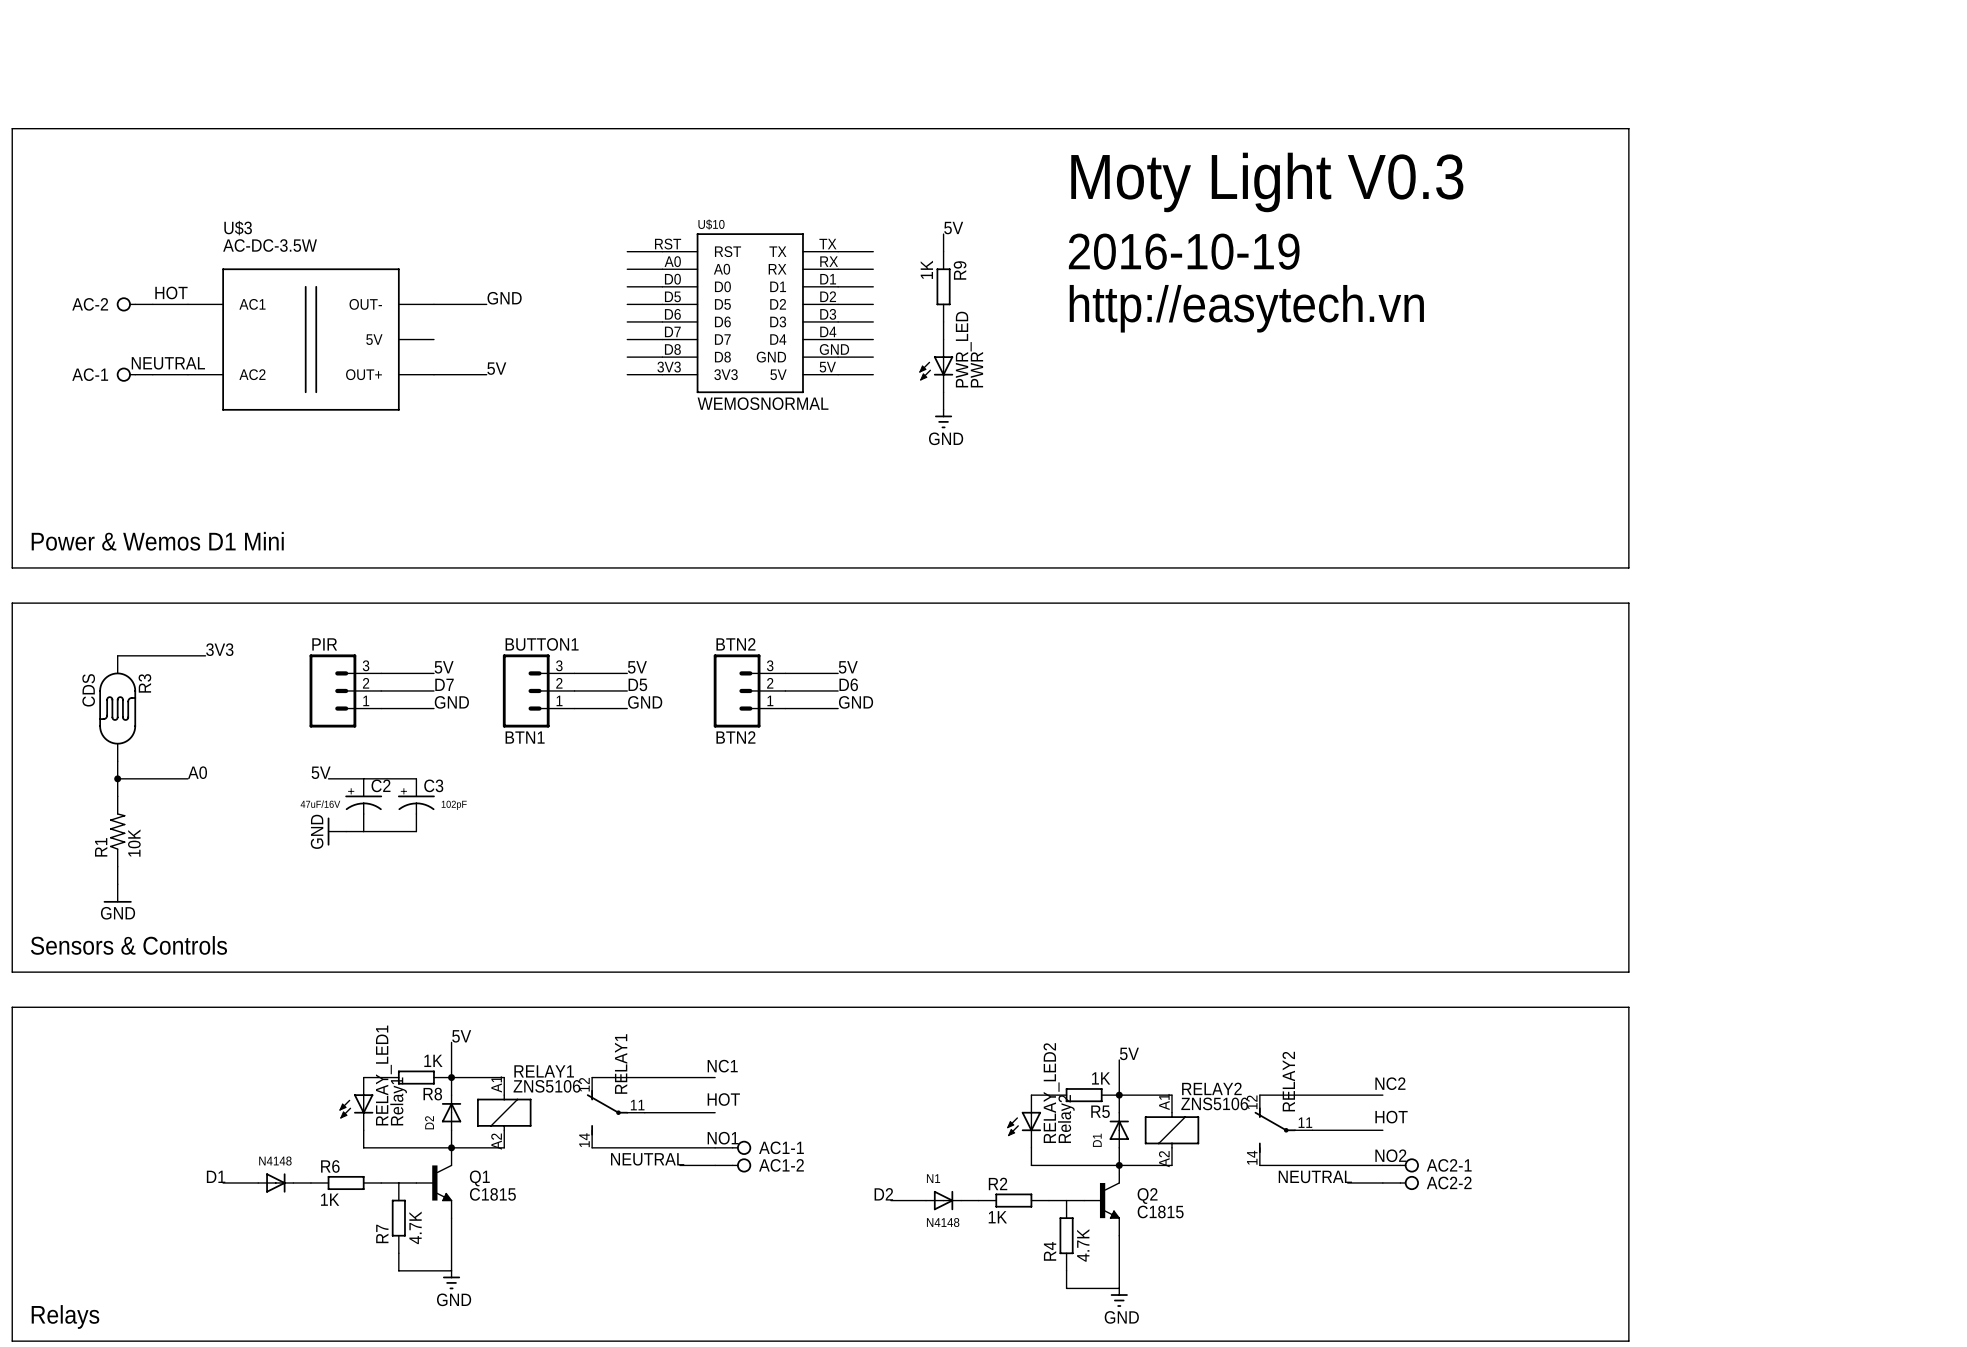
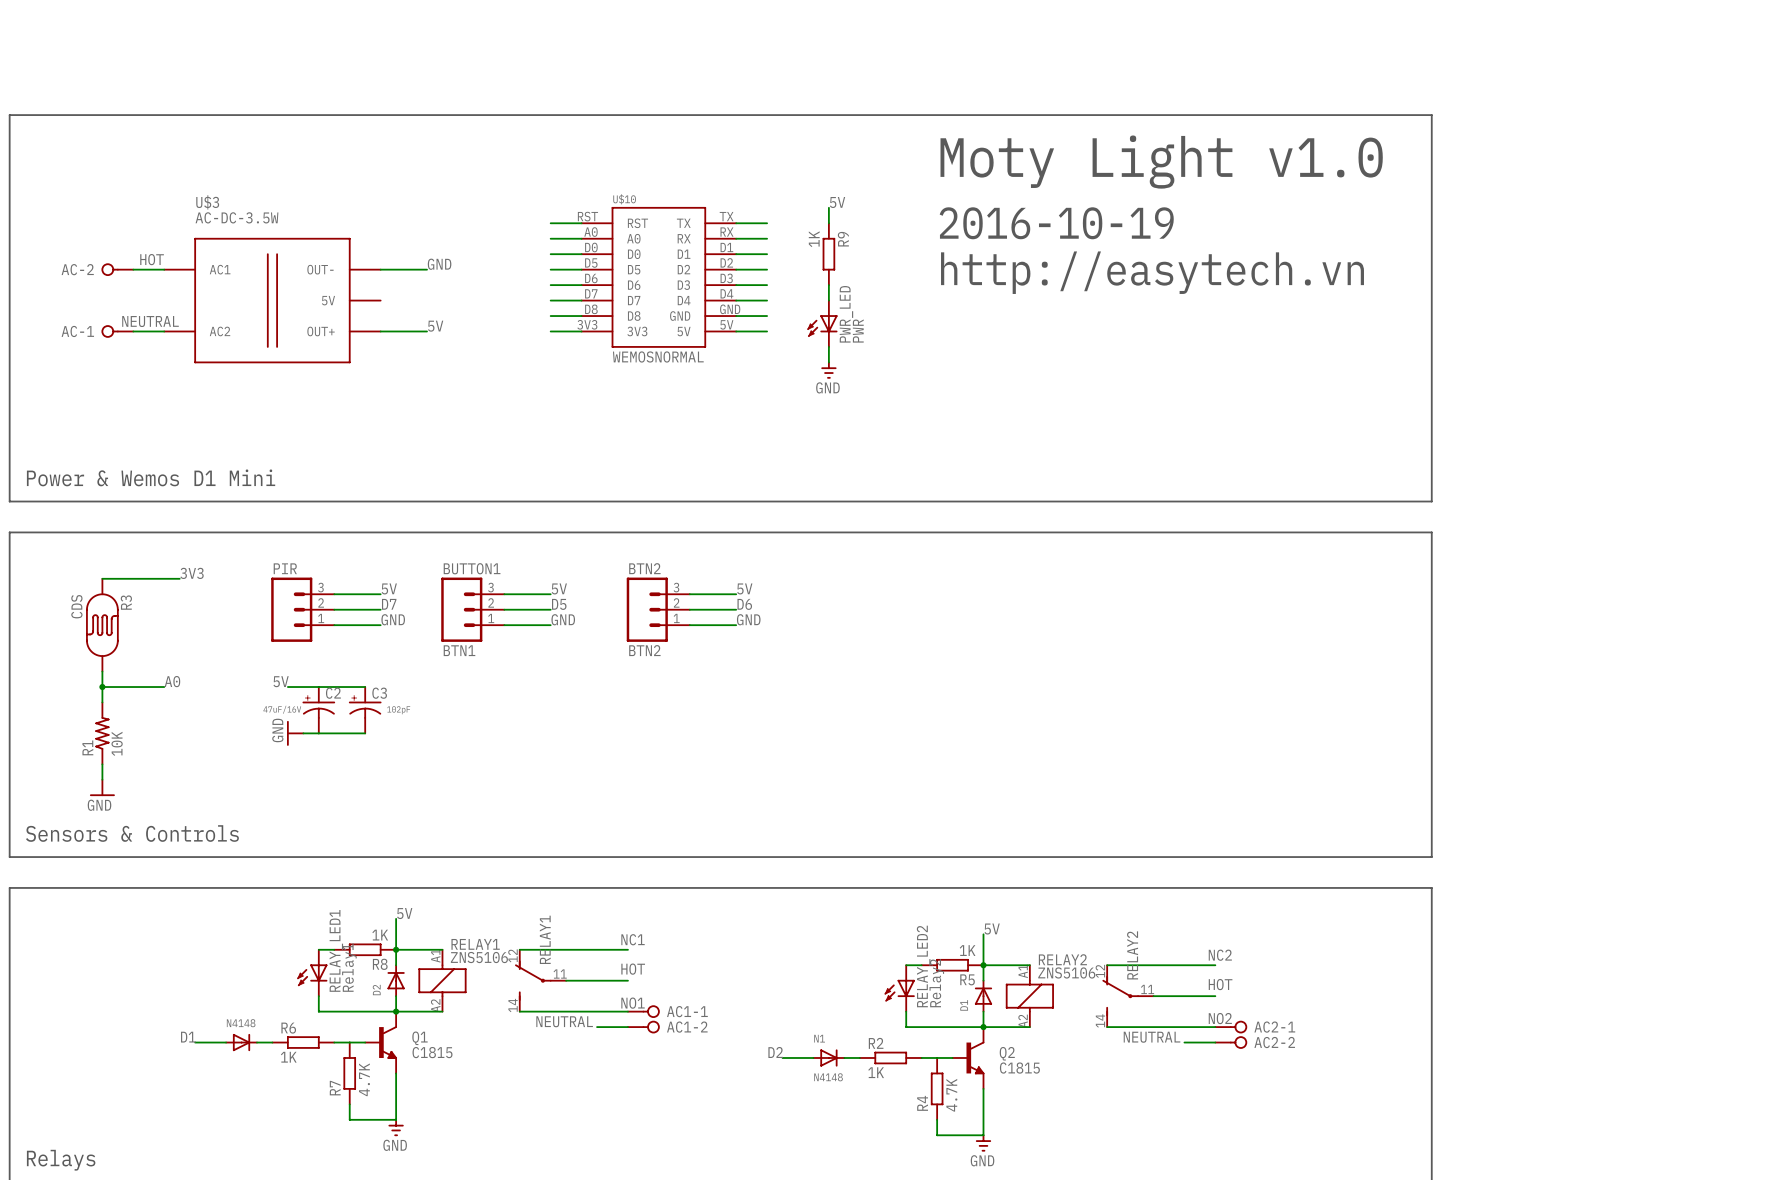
text: Moty Light V0.3 (1267, 182) -> Moty Light v1.0 (1161, 162)

